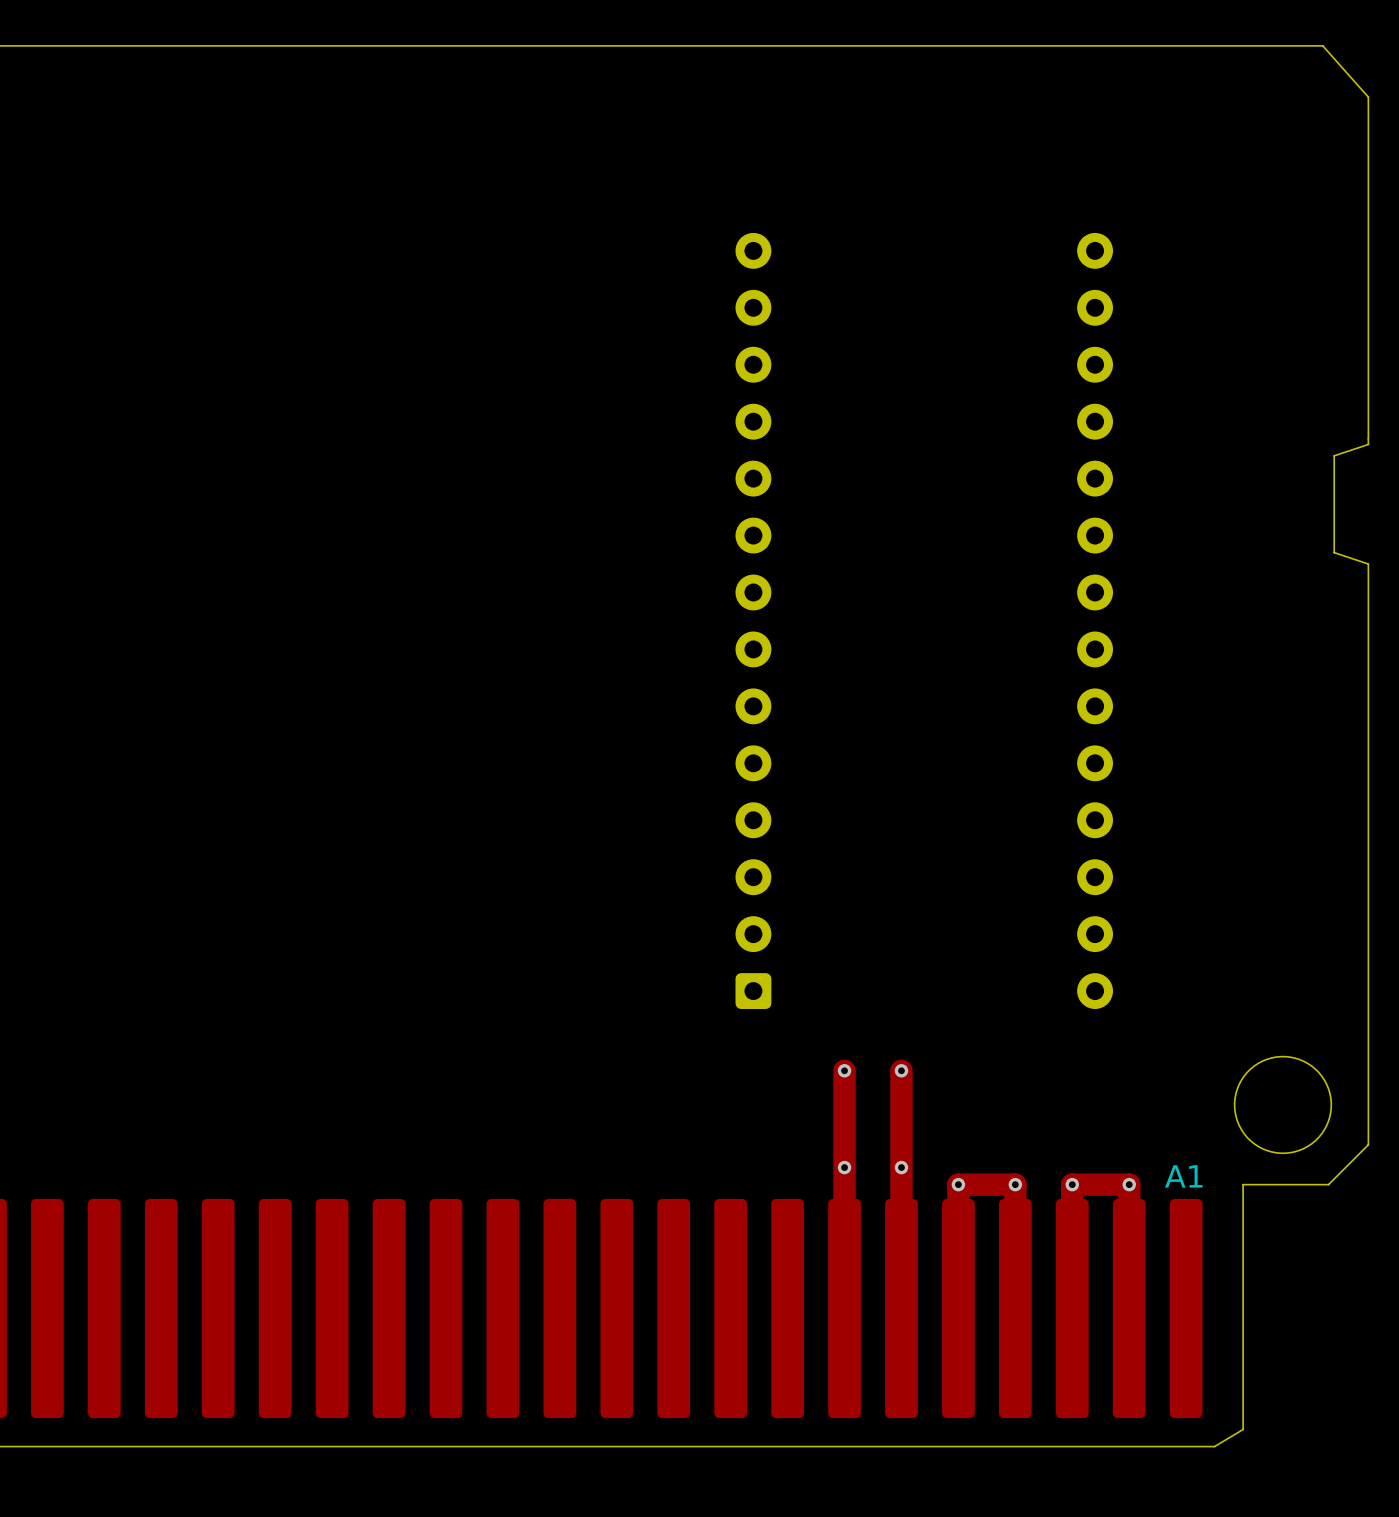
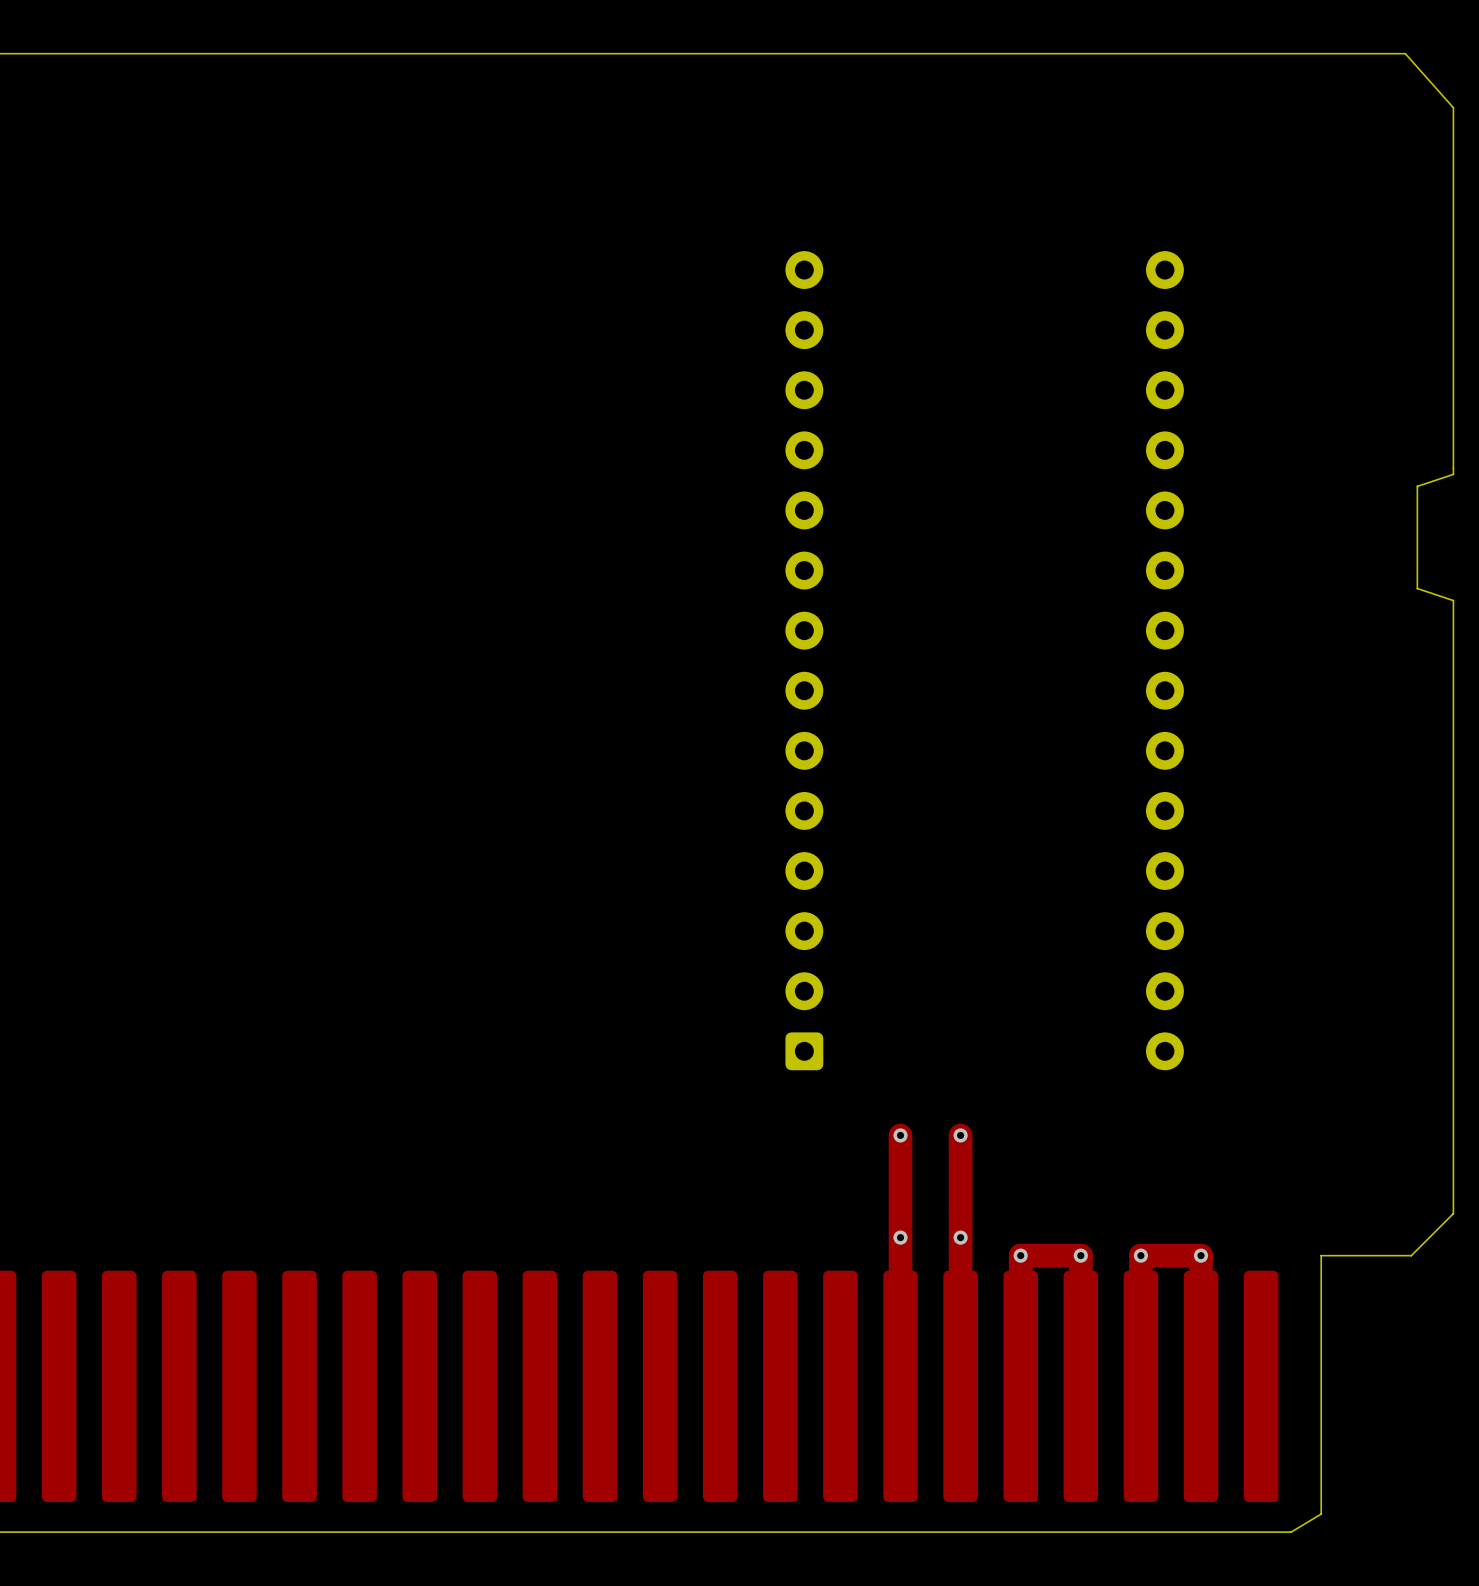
round board edge: [1234, 1056, 1332, 1154] -> none
text: A1 (1183, 1176) -> none

